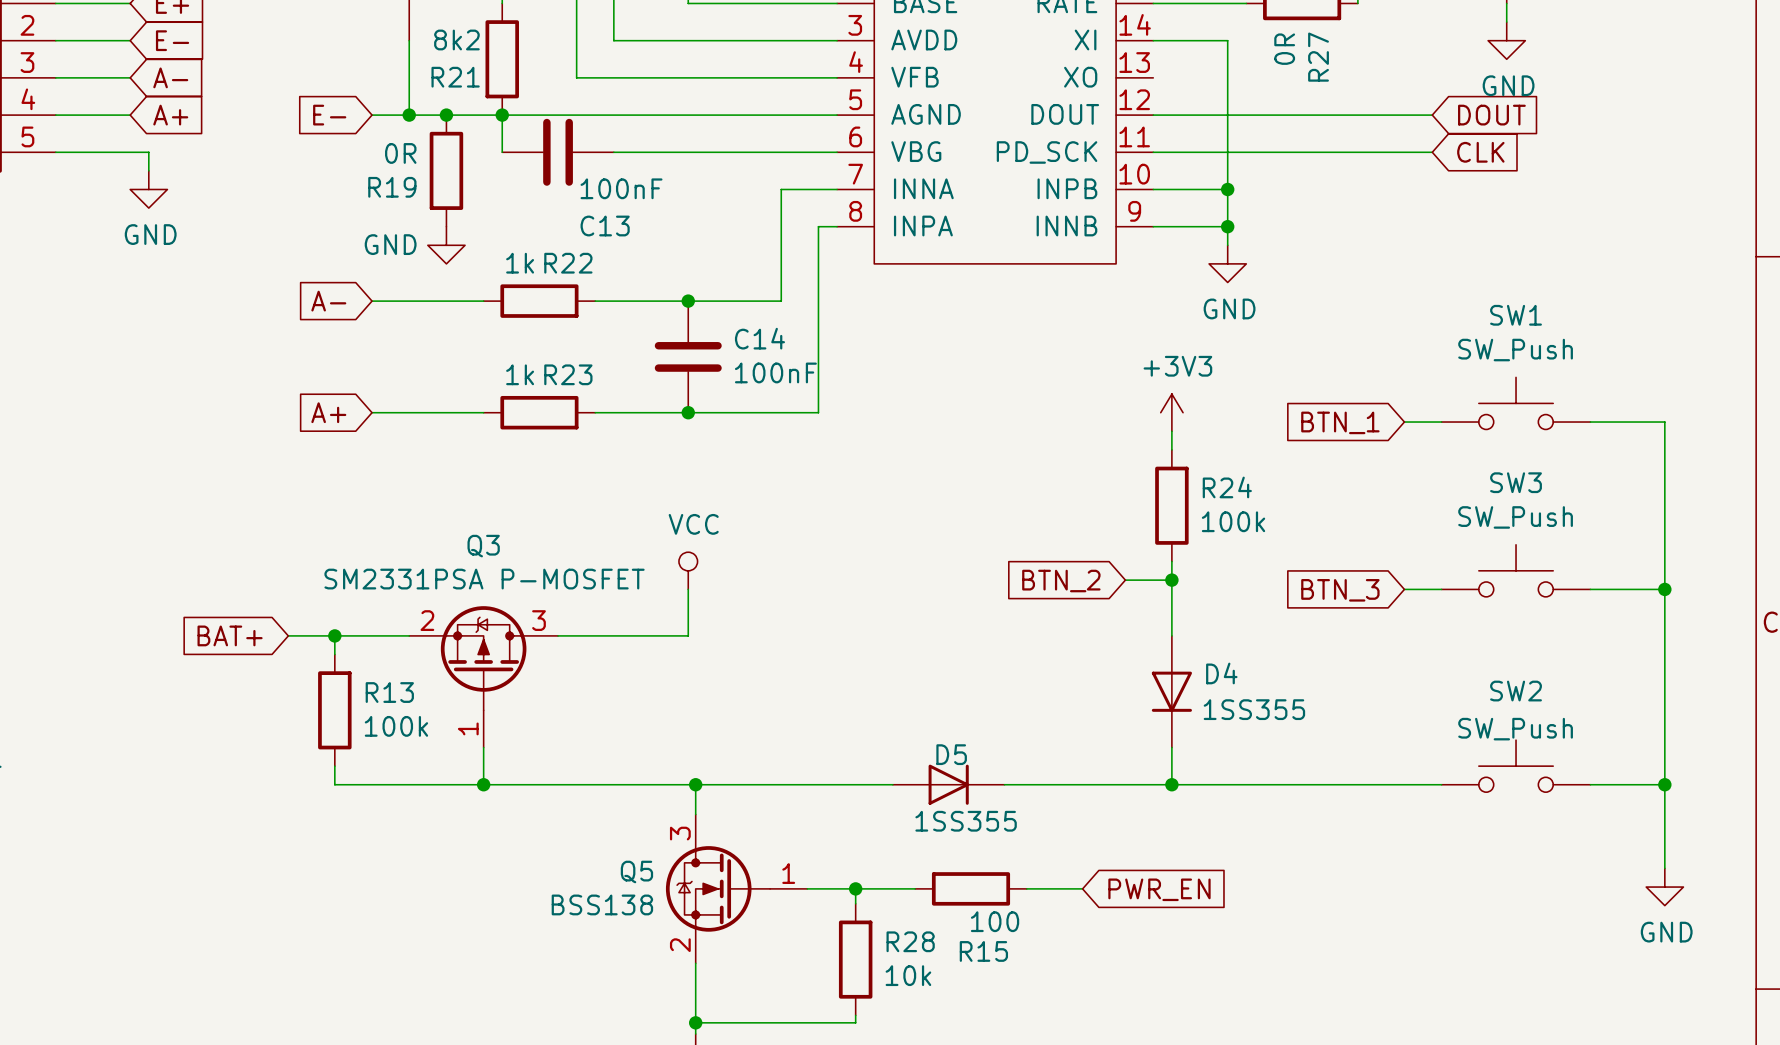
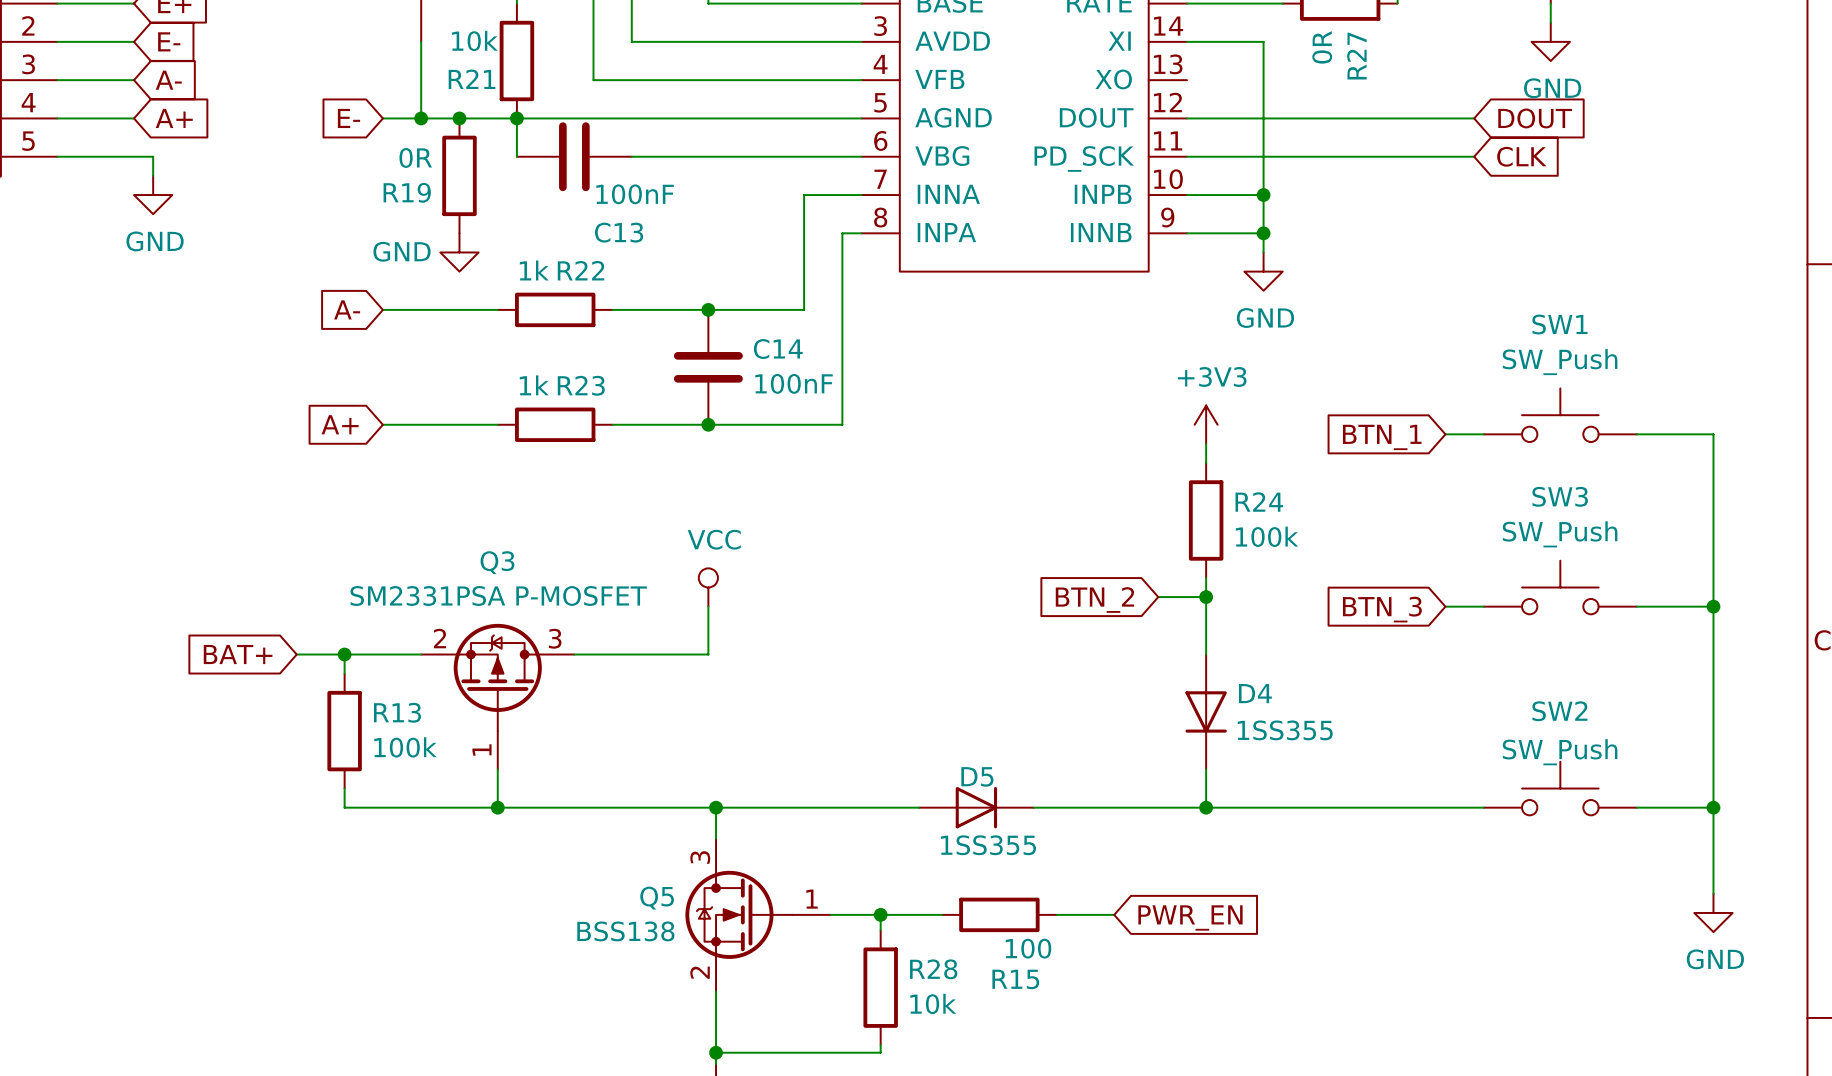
R21 value: 8k2 (456, 39) -> 10k (474, 40)

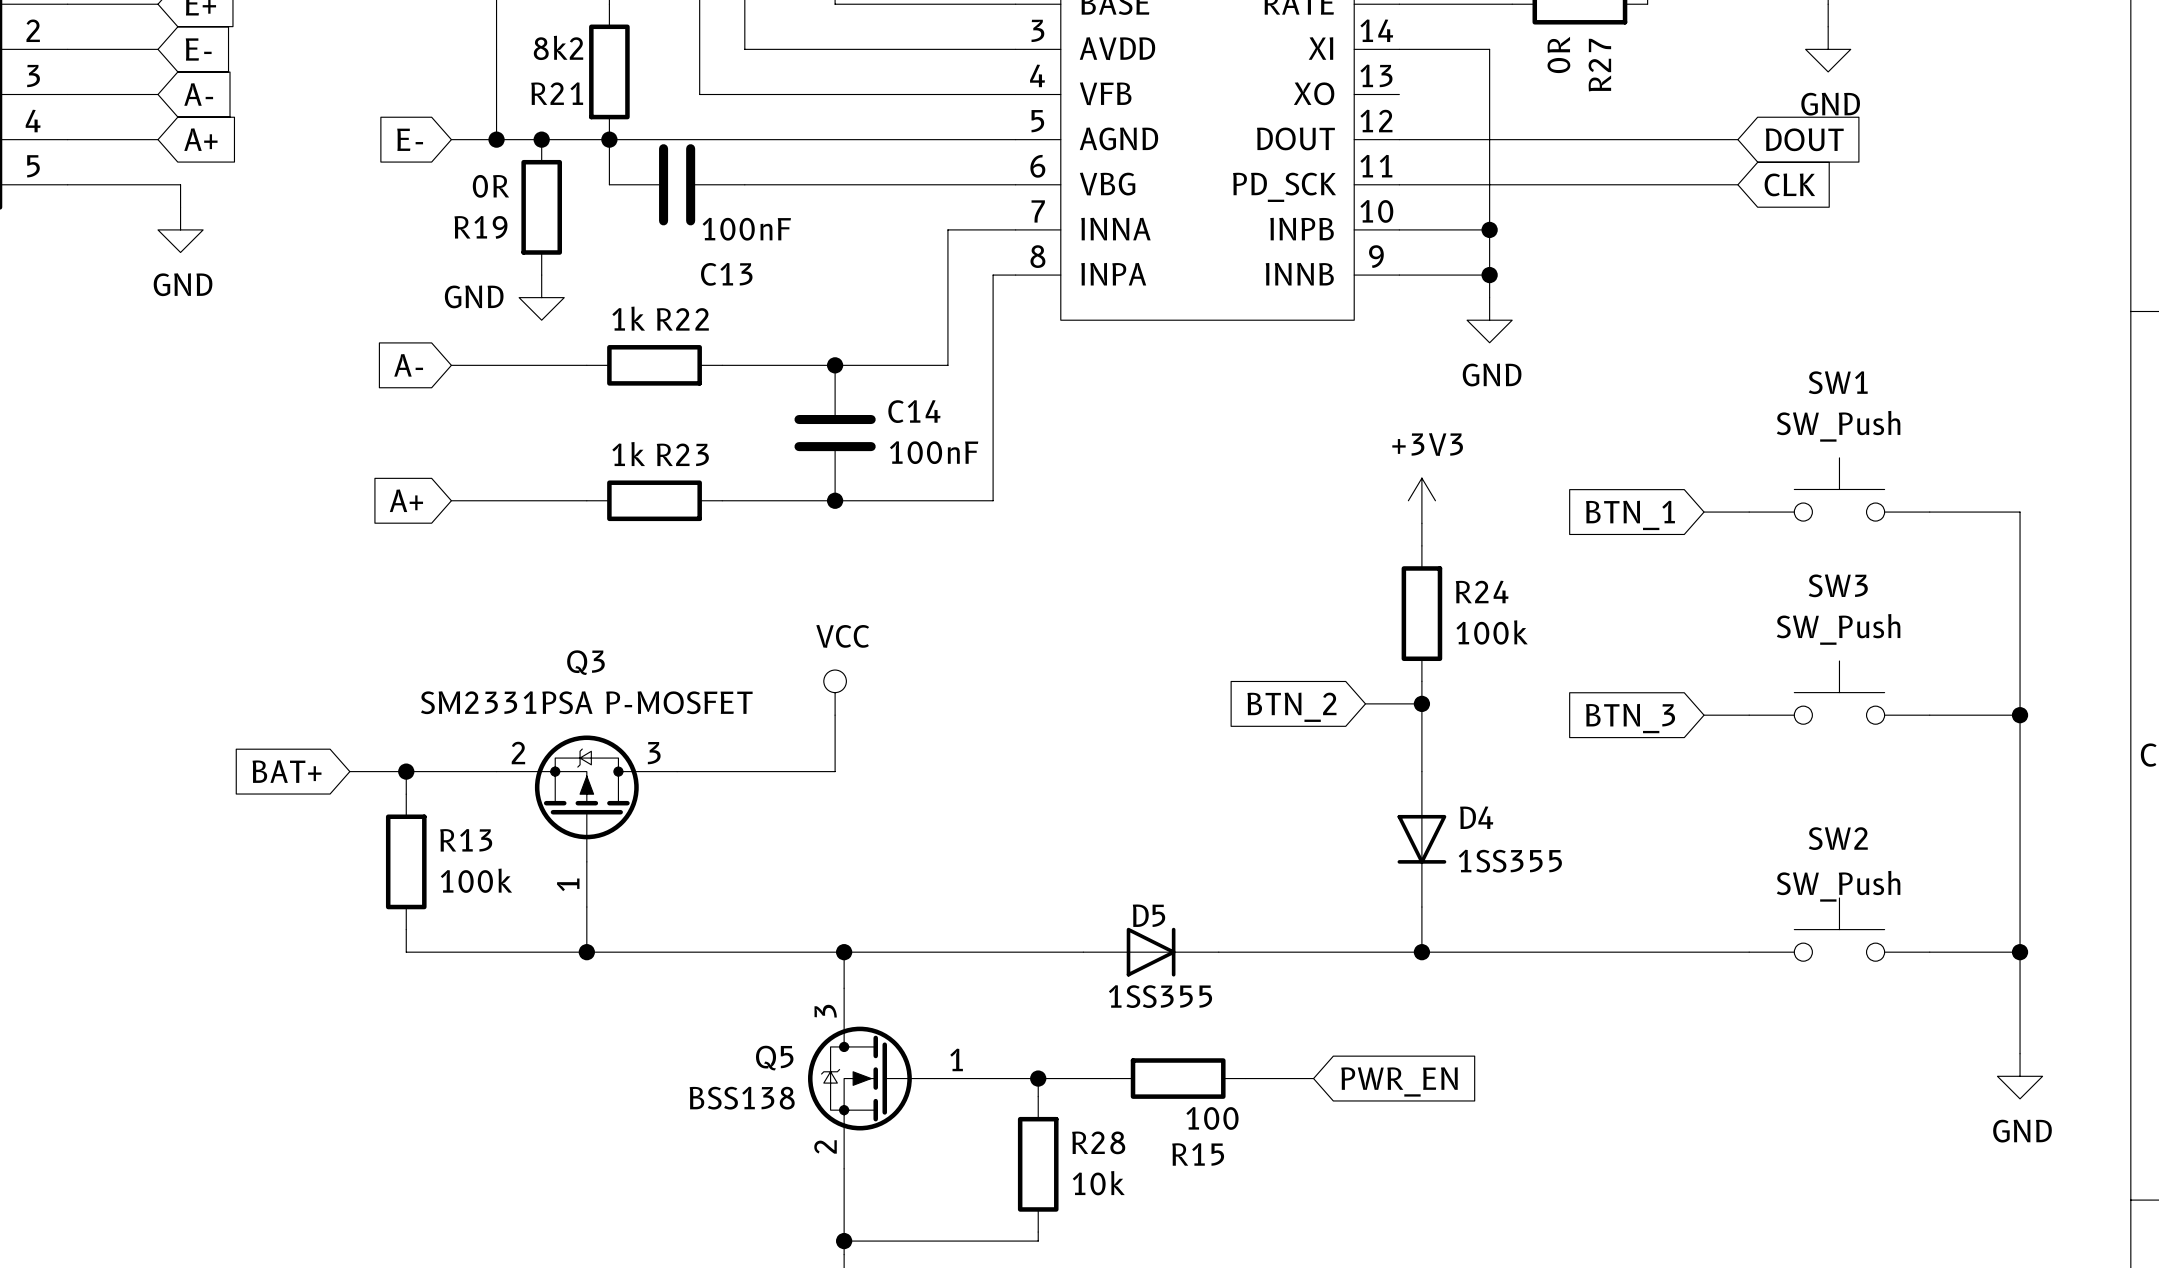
R21 value: 10k (474, 40) -> 8k2 (558, 47)

